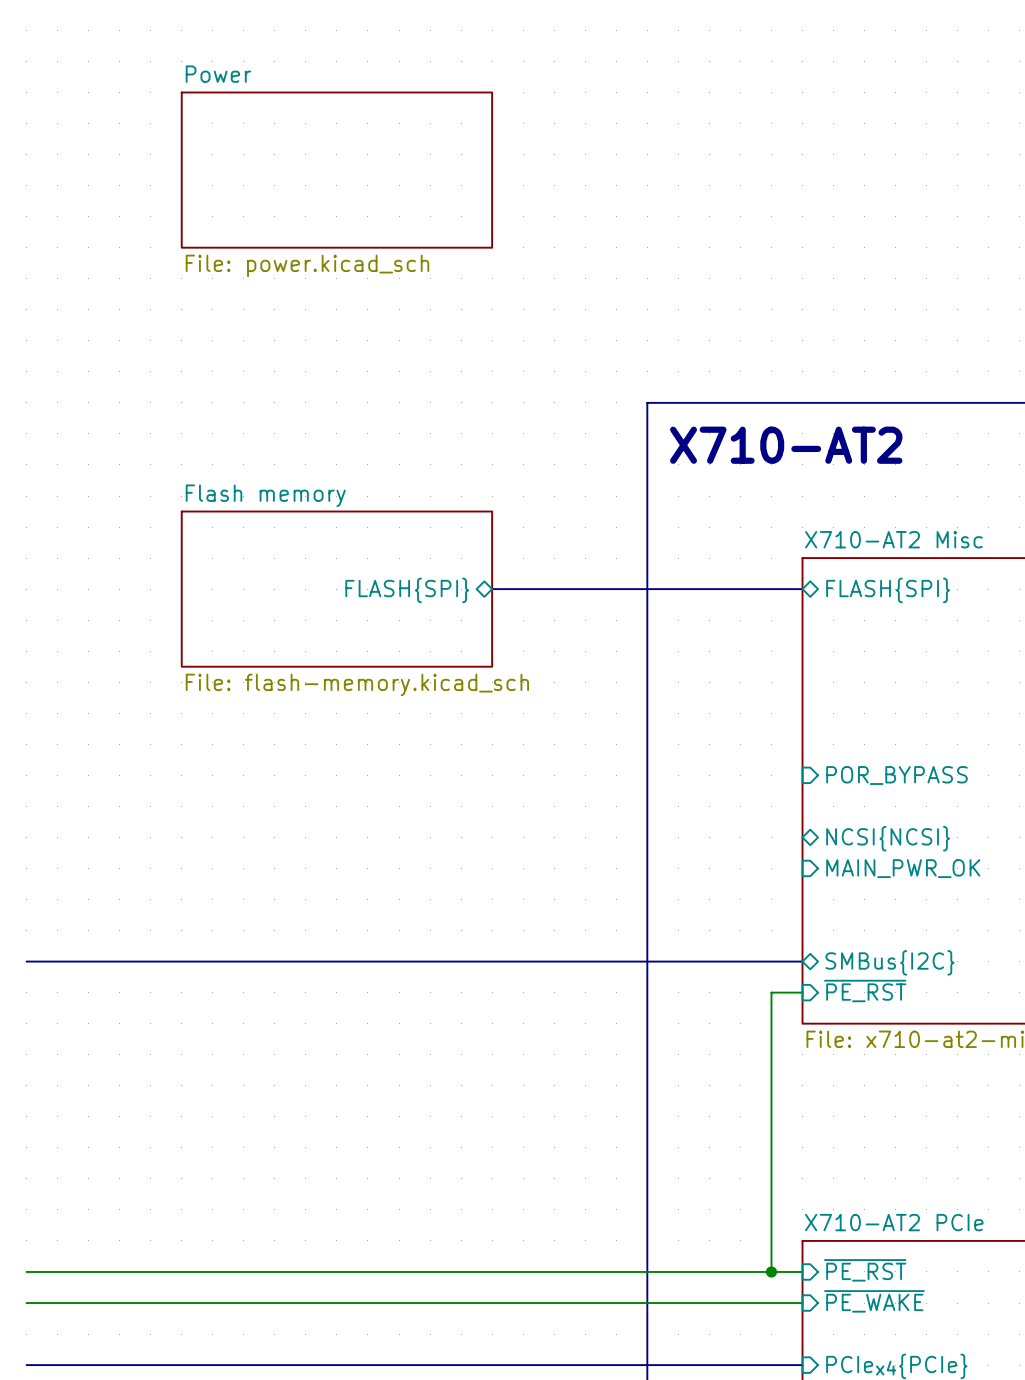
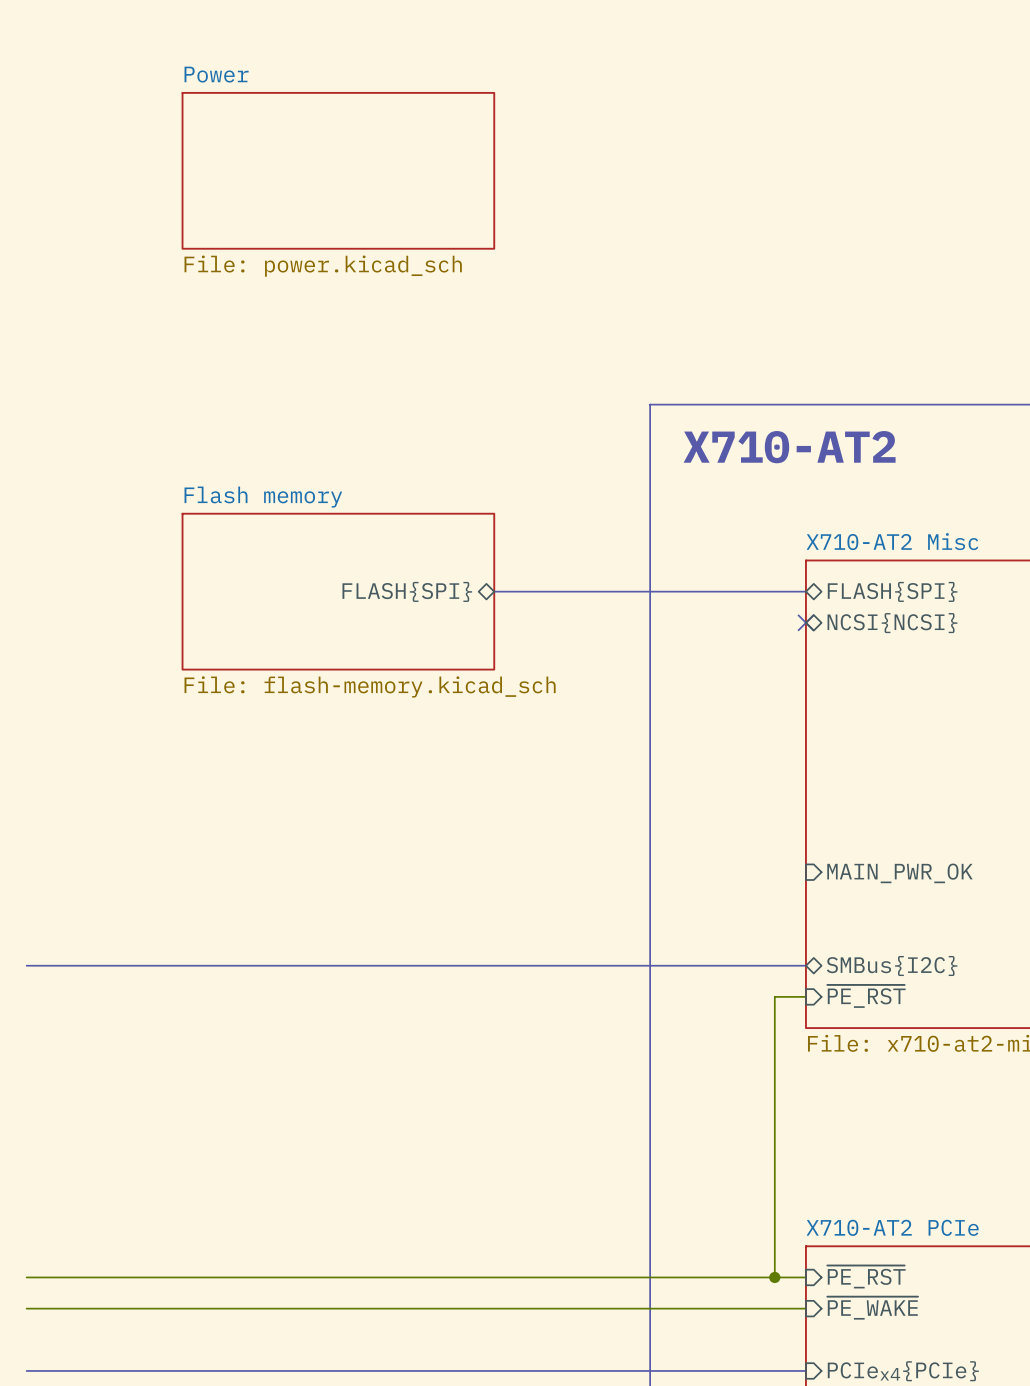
no-connect mark: none -> (805, 622)
sheet pin: POR_BYPASS (896, 775) -> none
sheet pin position: NCSI{NCSI} (888, 838) -> NCSI{NCSI} (892, 623)

